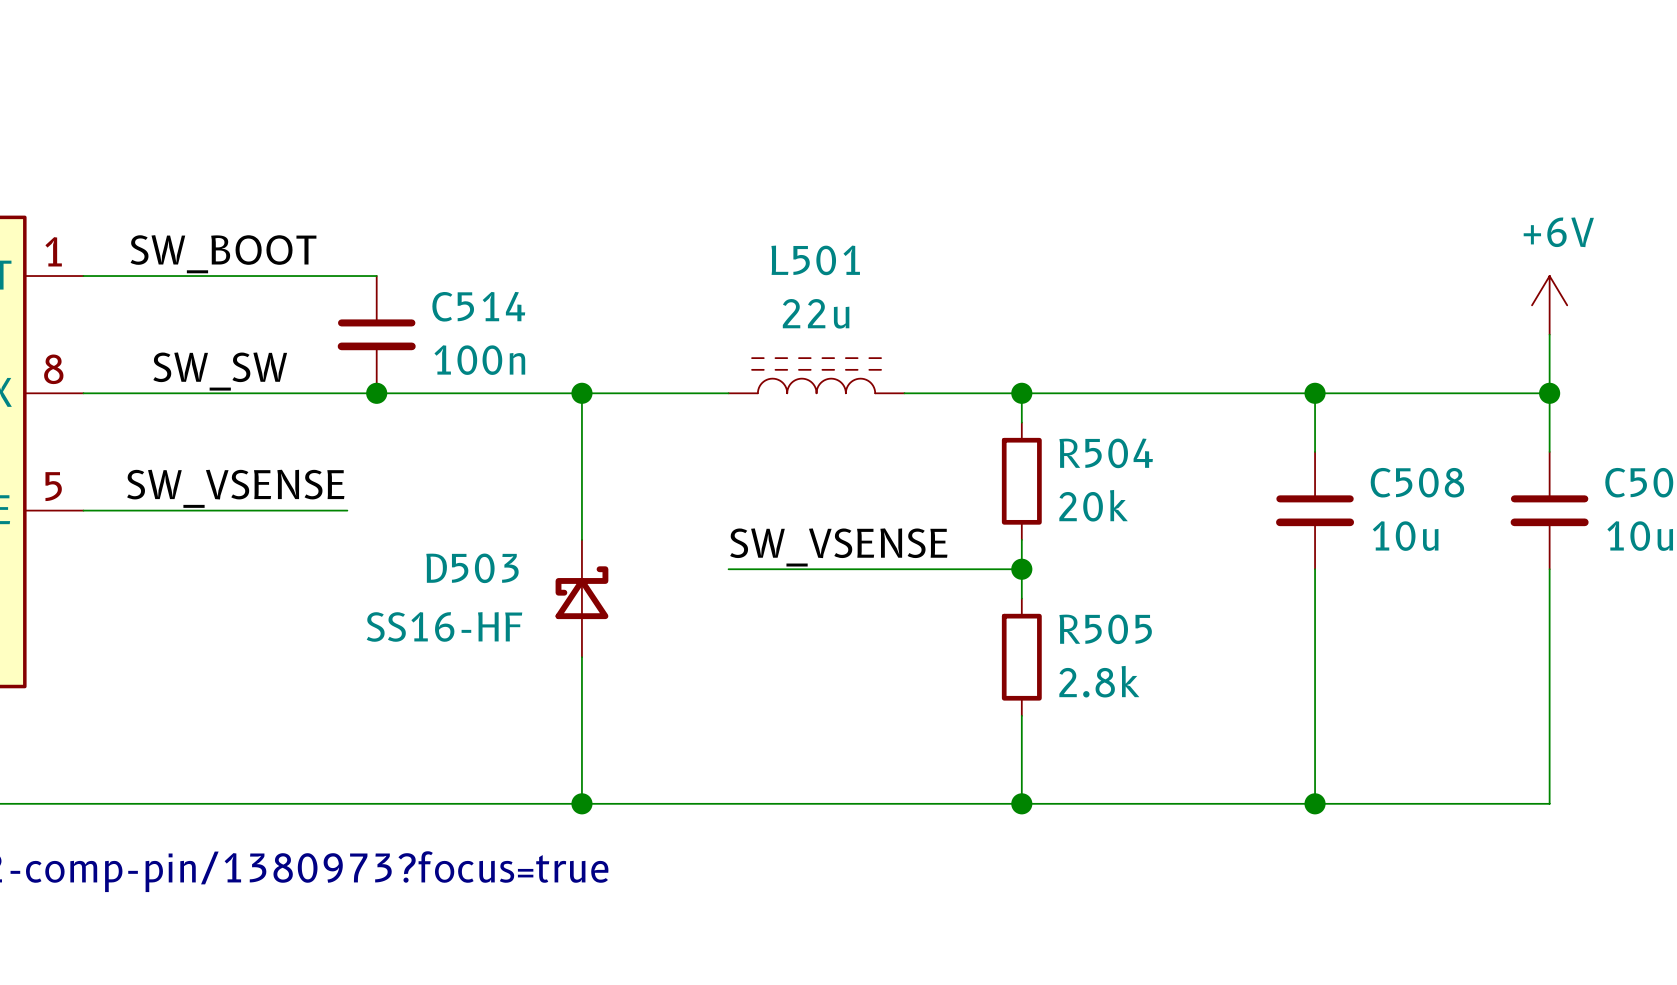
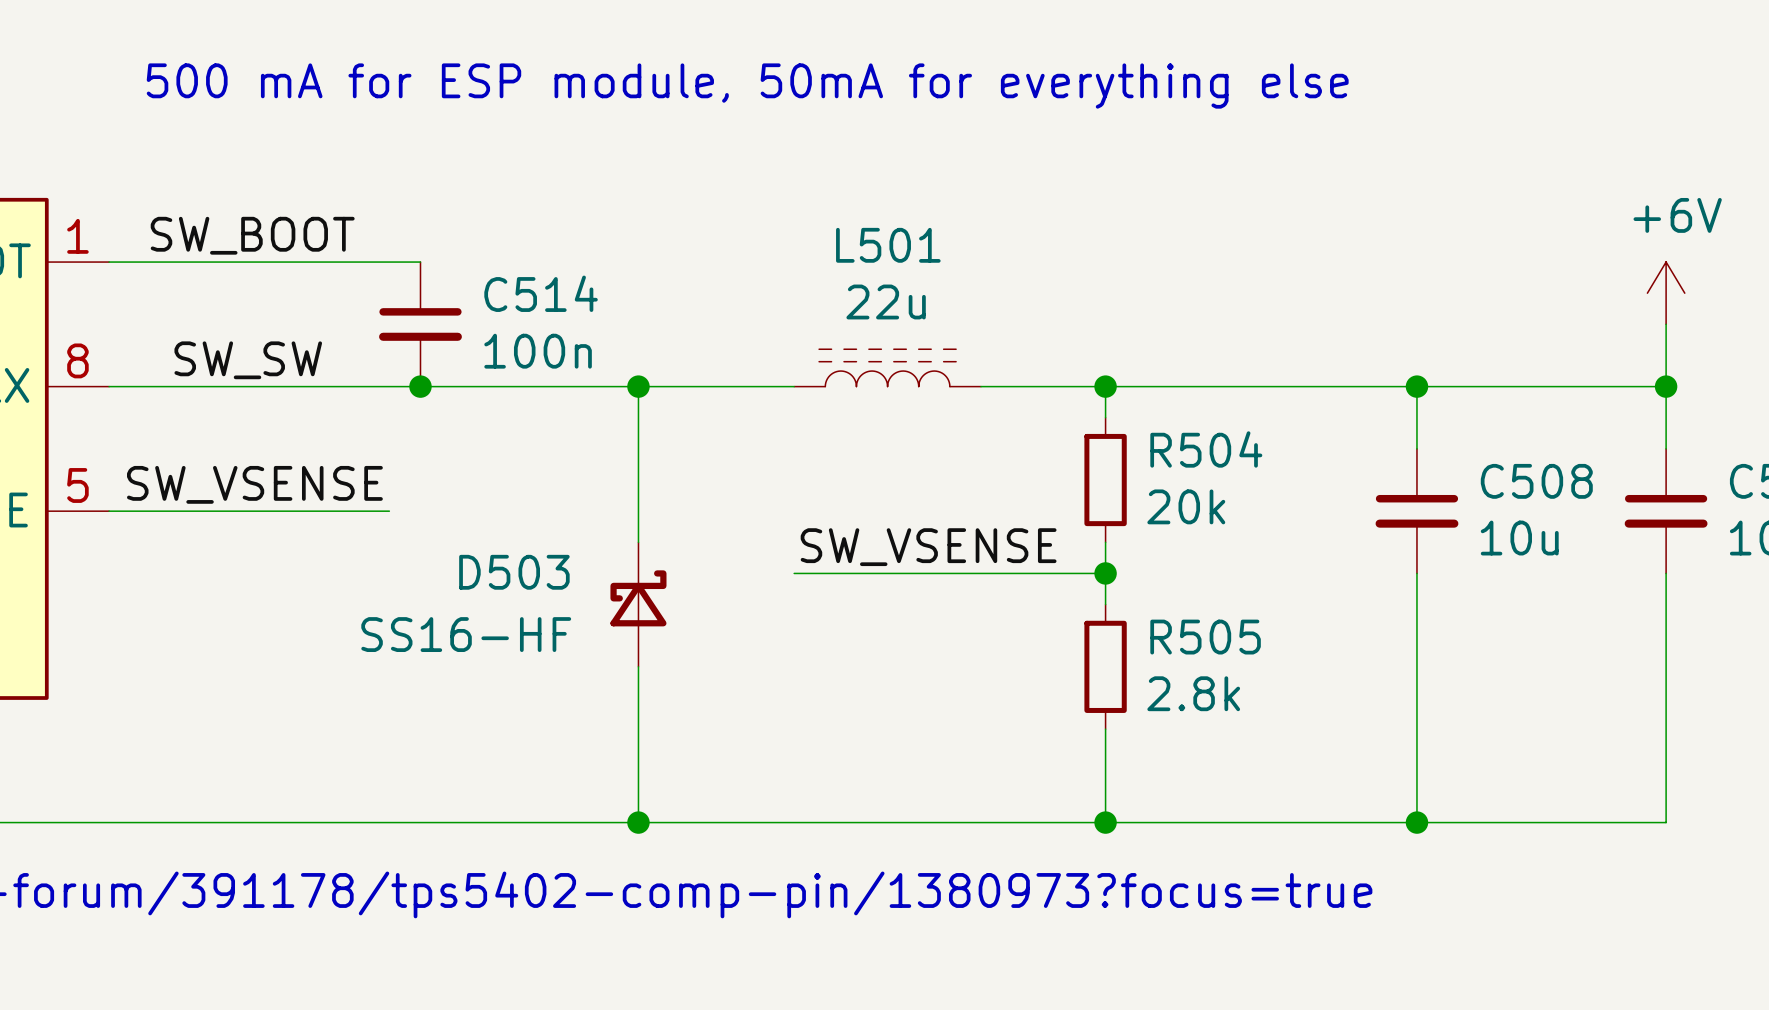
text: none -> 500 mA for ESP module, 50mA for everything else (747, 86)

